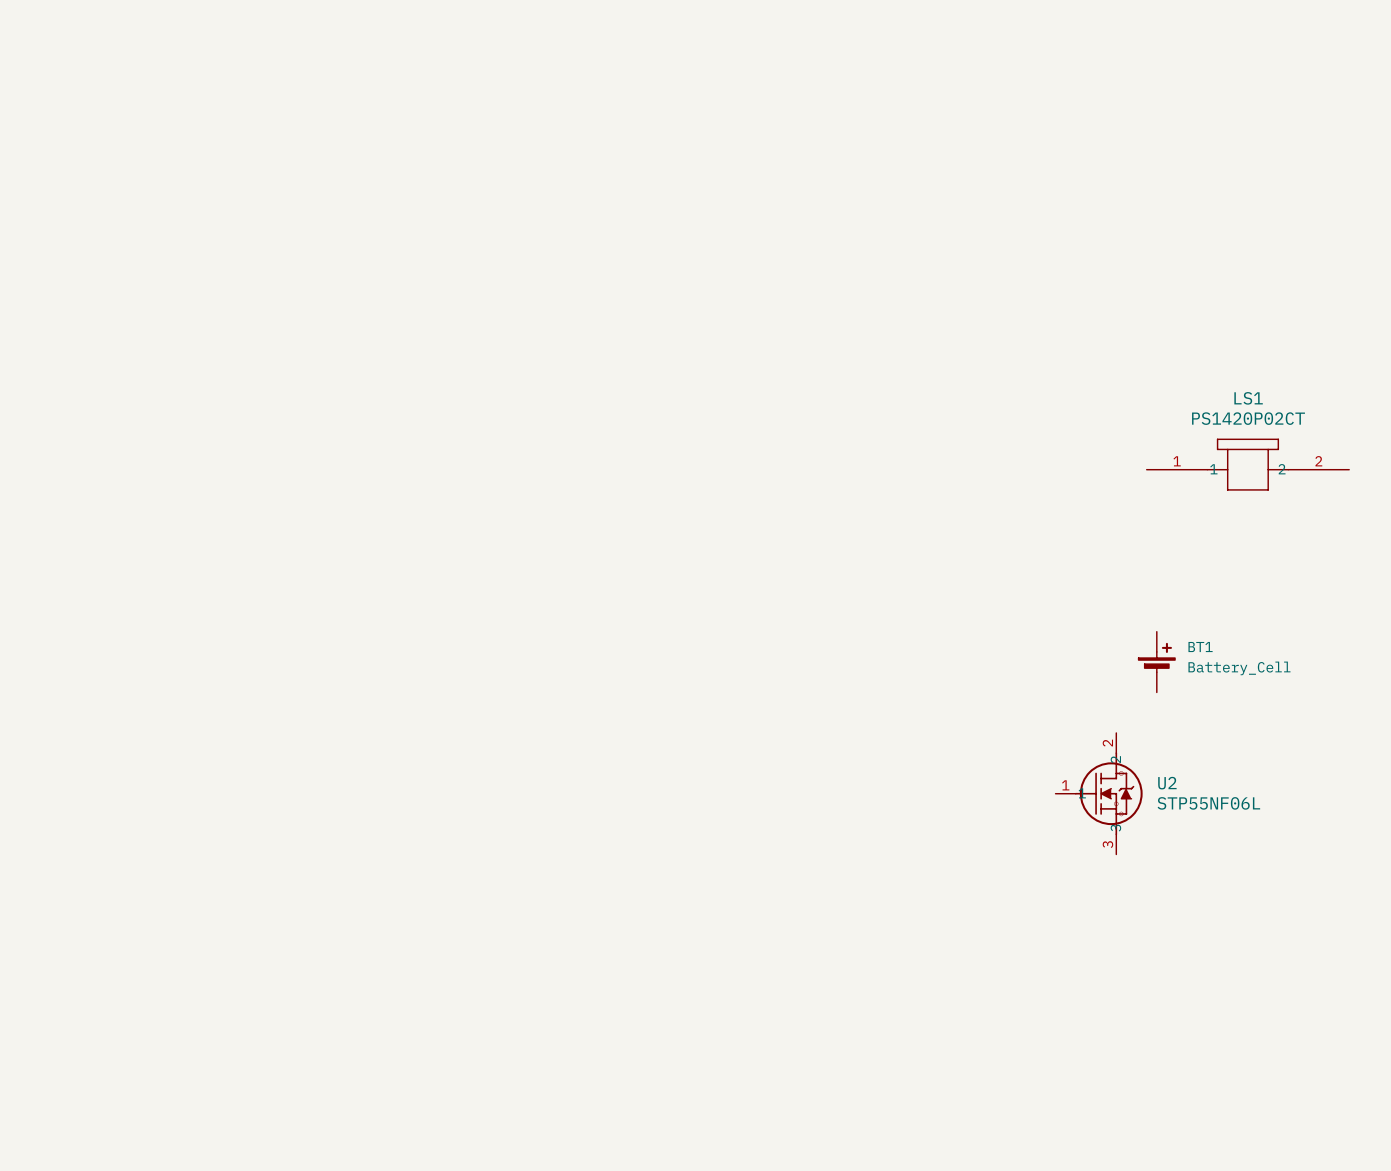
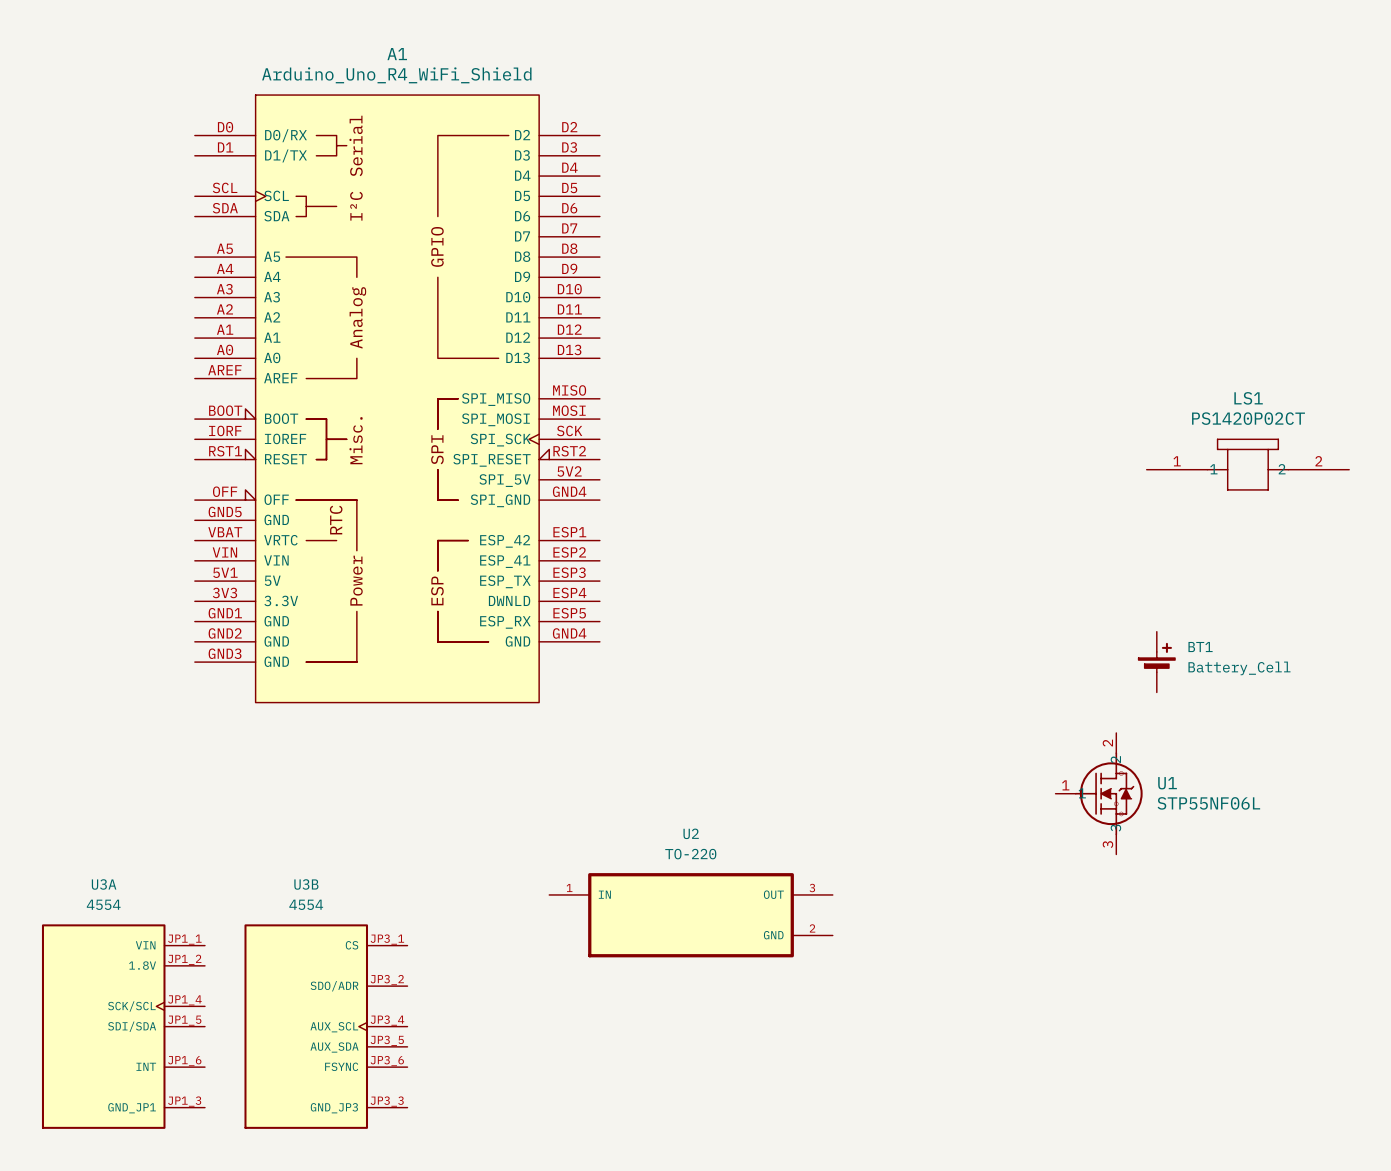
A1: none -> Arduino_Uno_R4_WiFi_Shield (397, 398)
U2 name: U2 (1167, 783) -> U1 (1167, 783)
U2: none -> TO-220 (691, 915)
U3A: none -> 4554 (123, 1026)
U3B: none -> 4554 (325, 1026)

